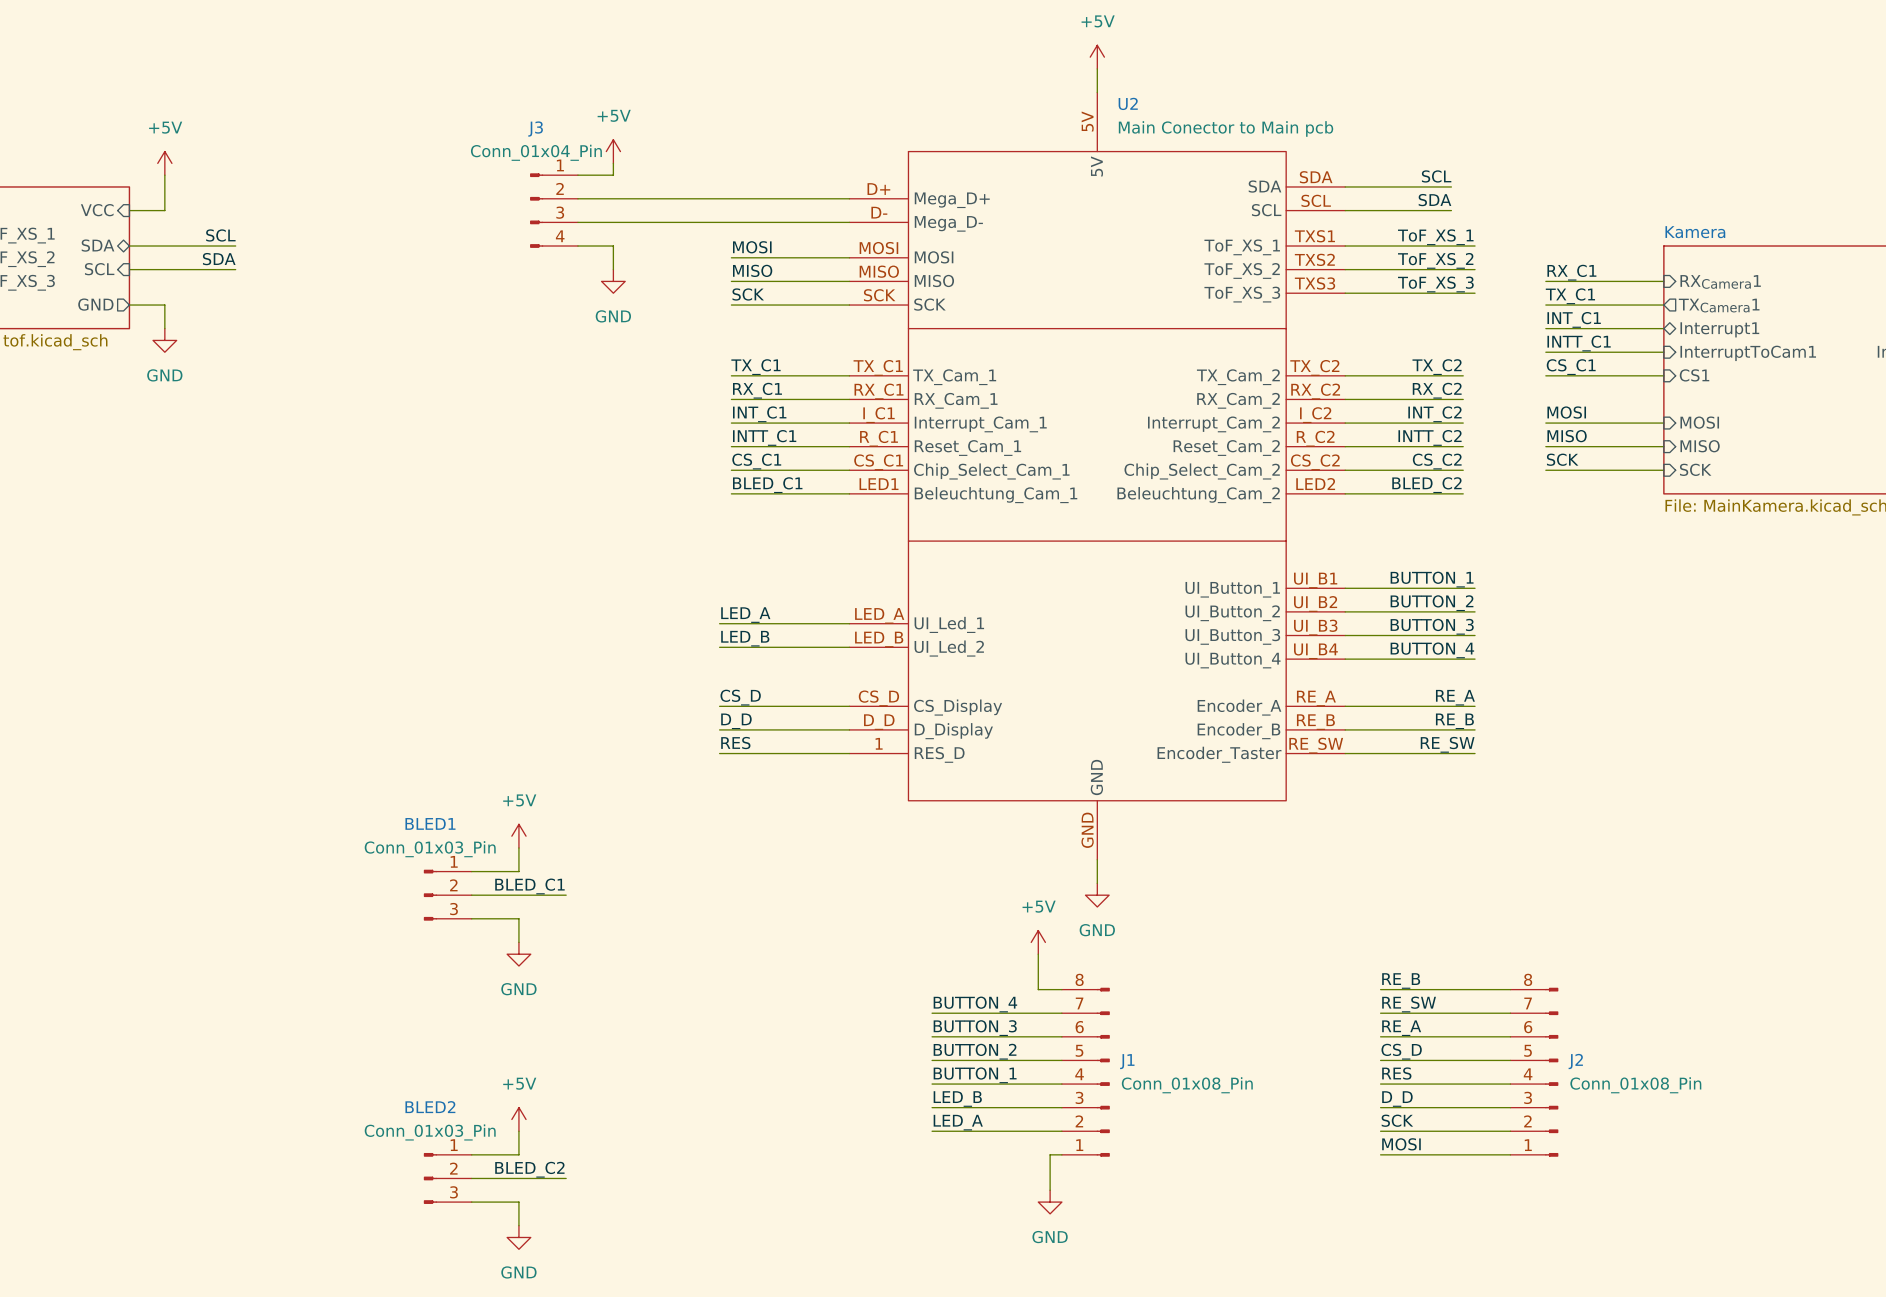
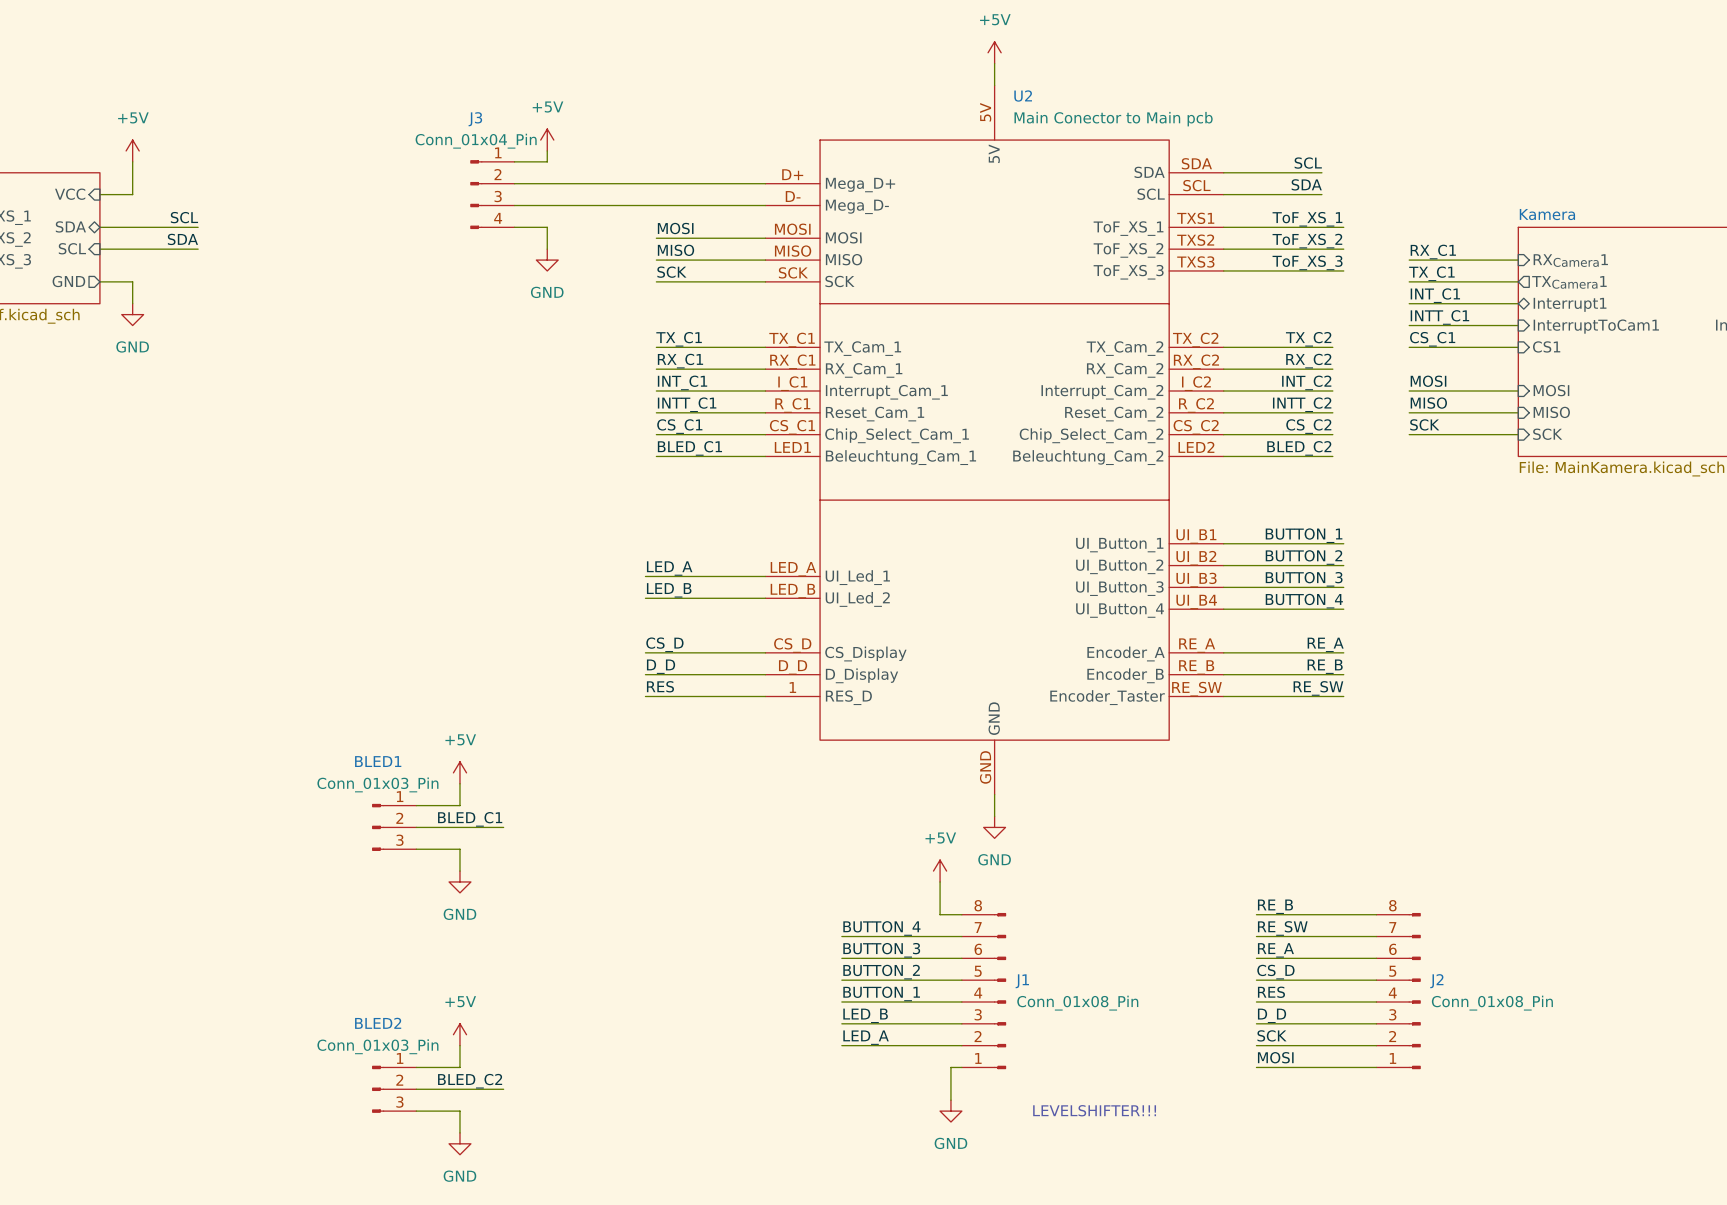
text: none -> LEVELSHIFTER!!! (1094, 1110)

